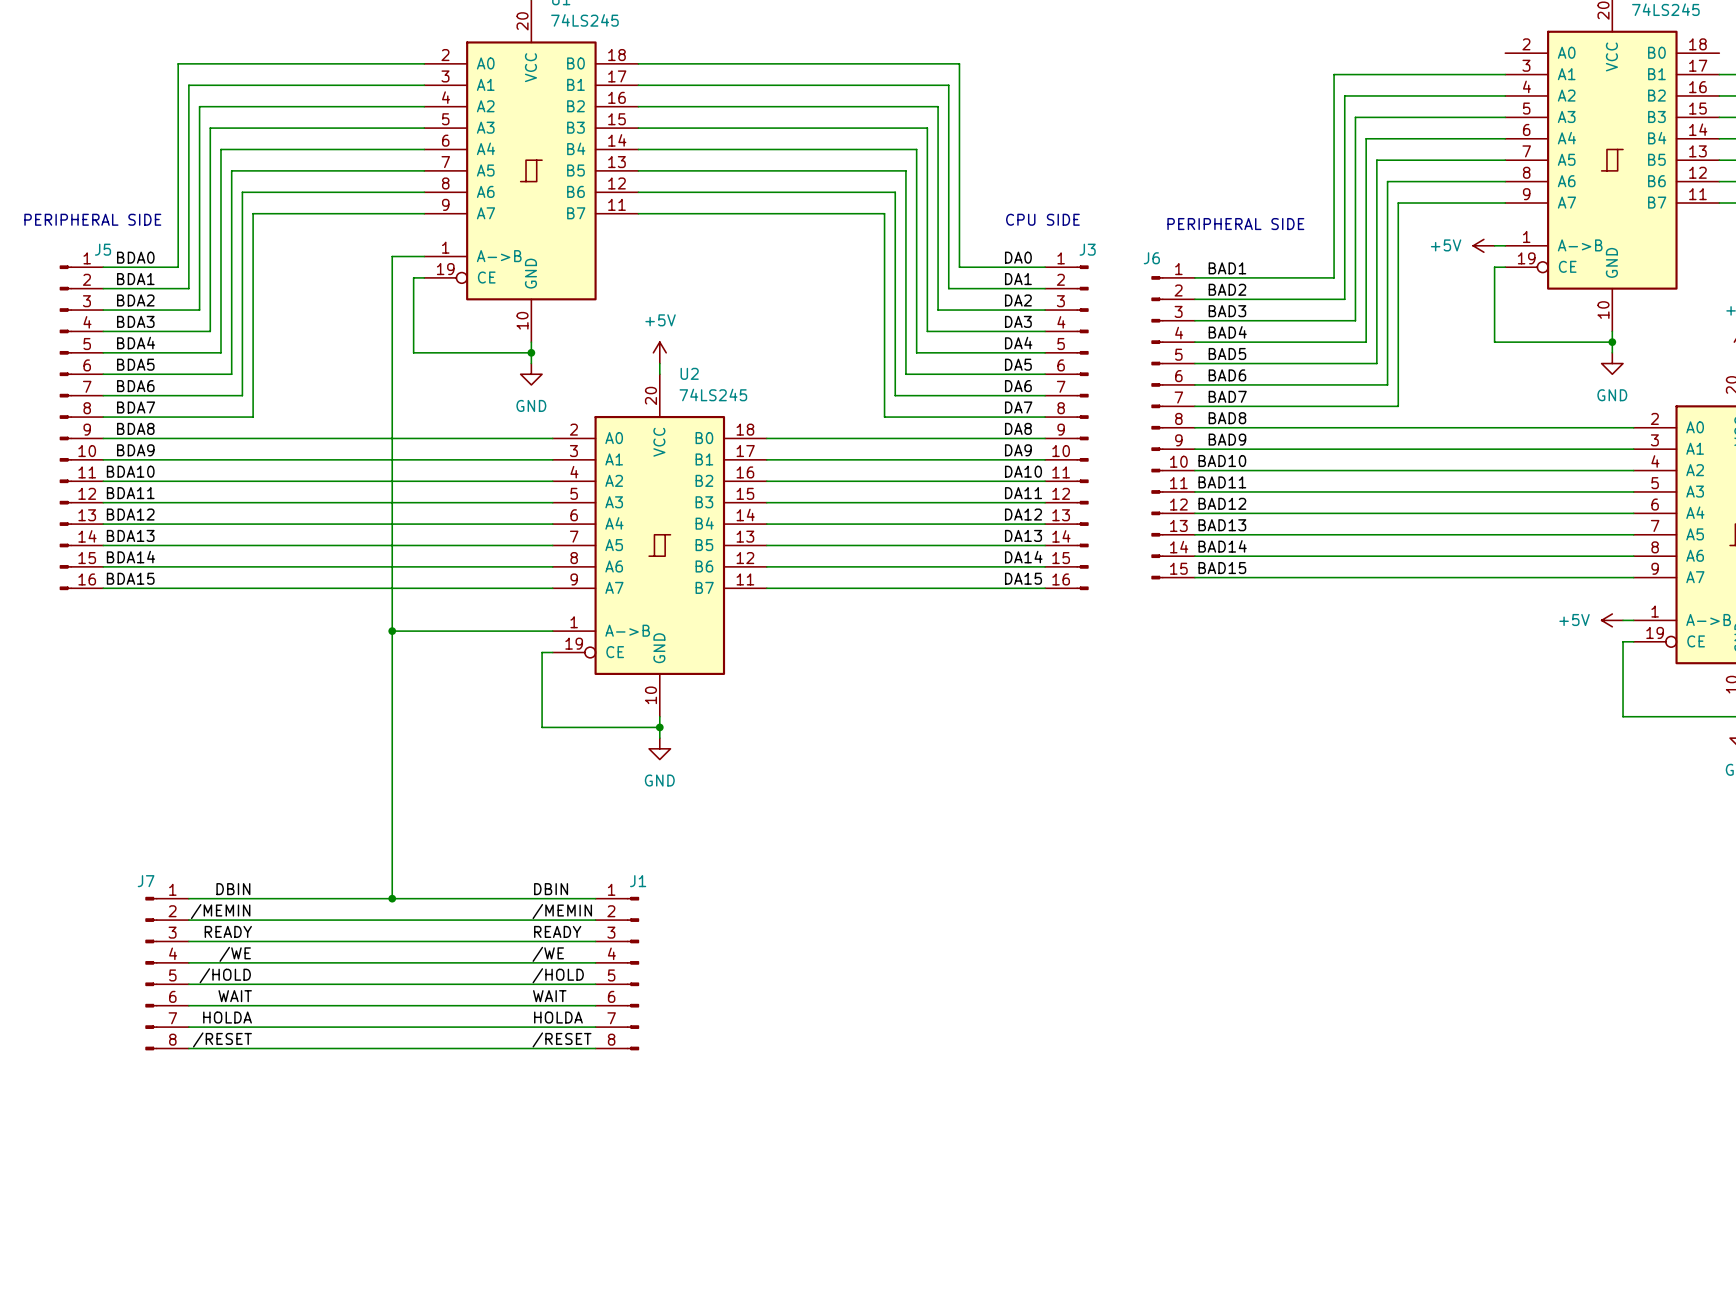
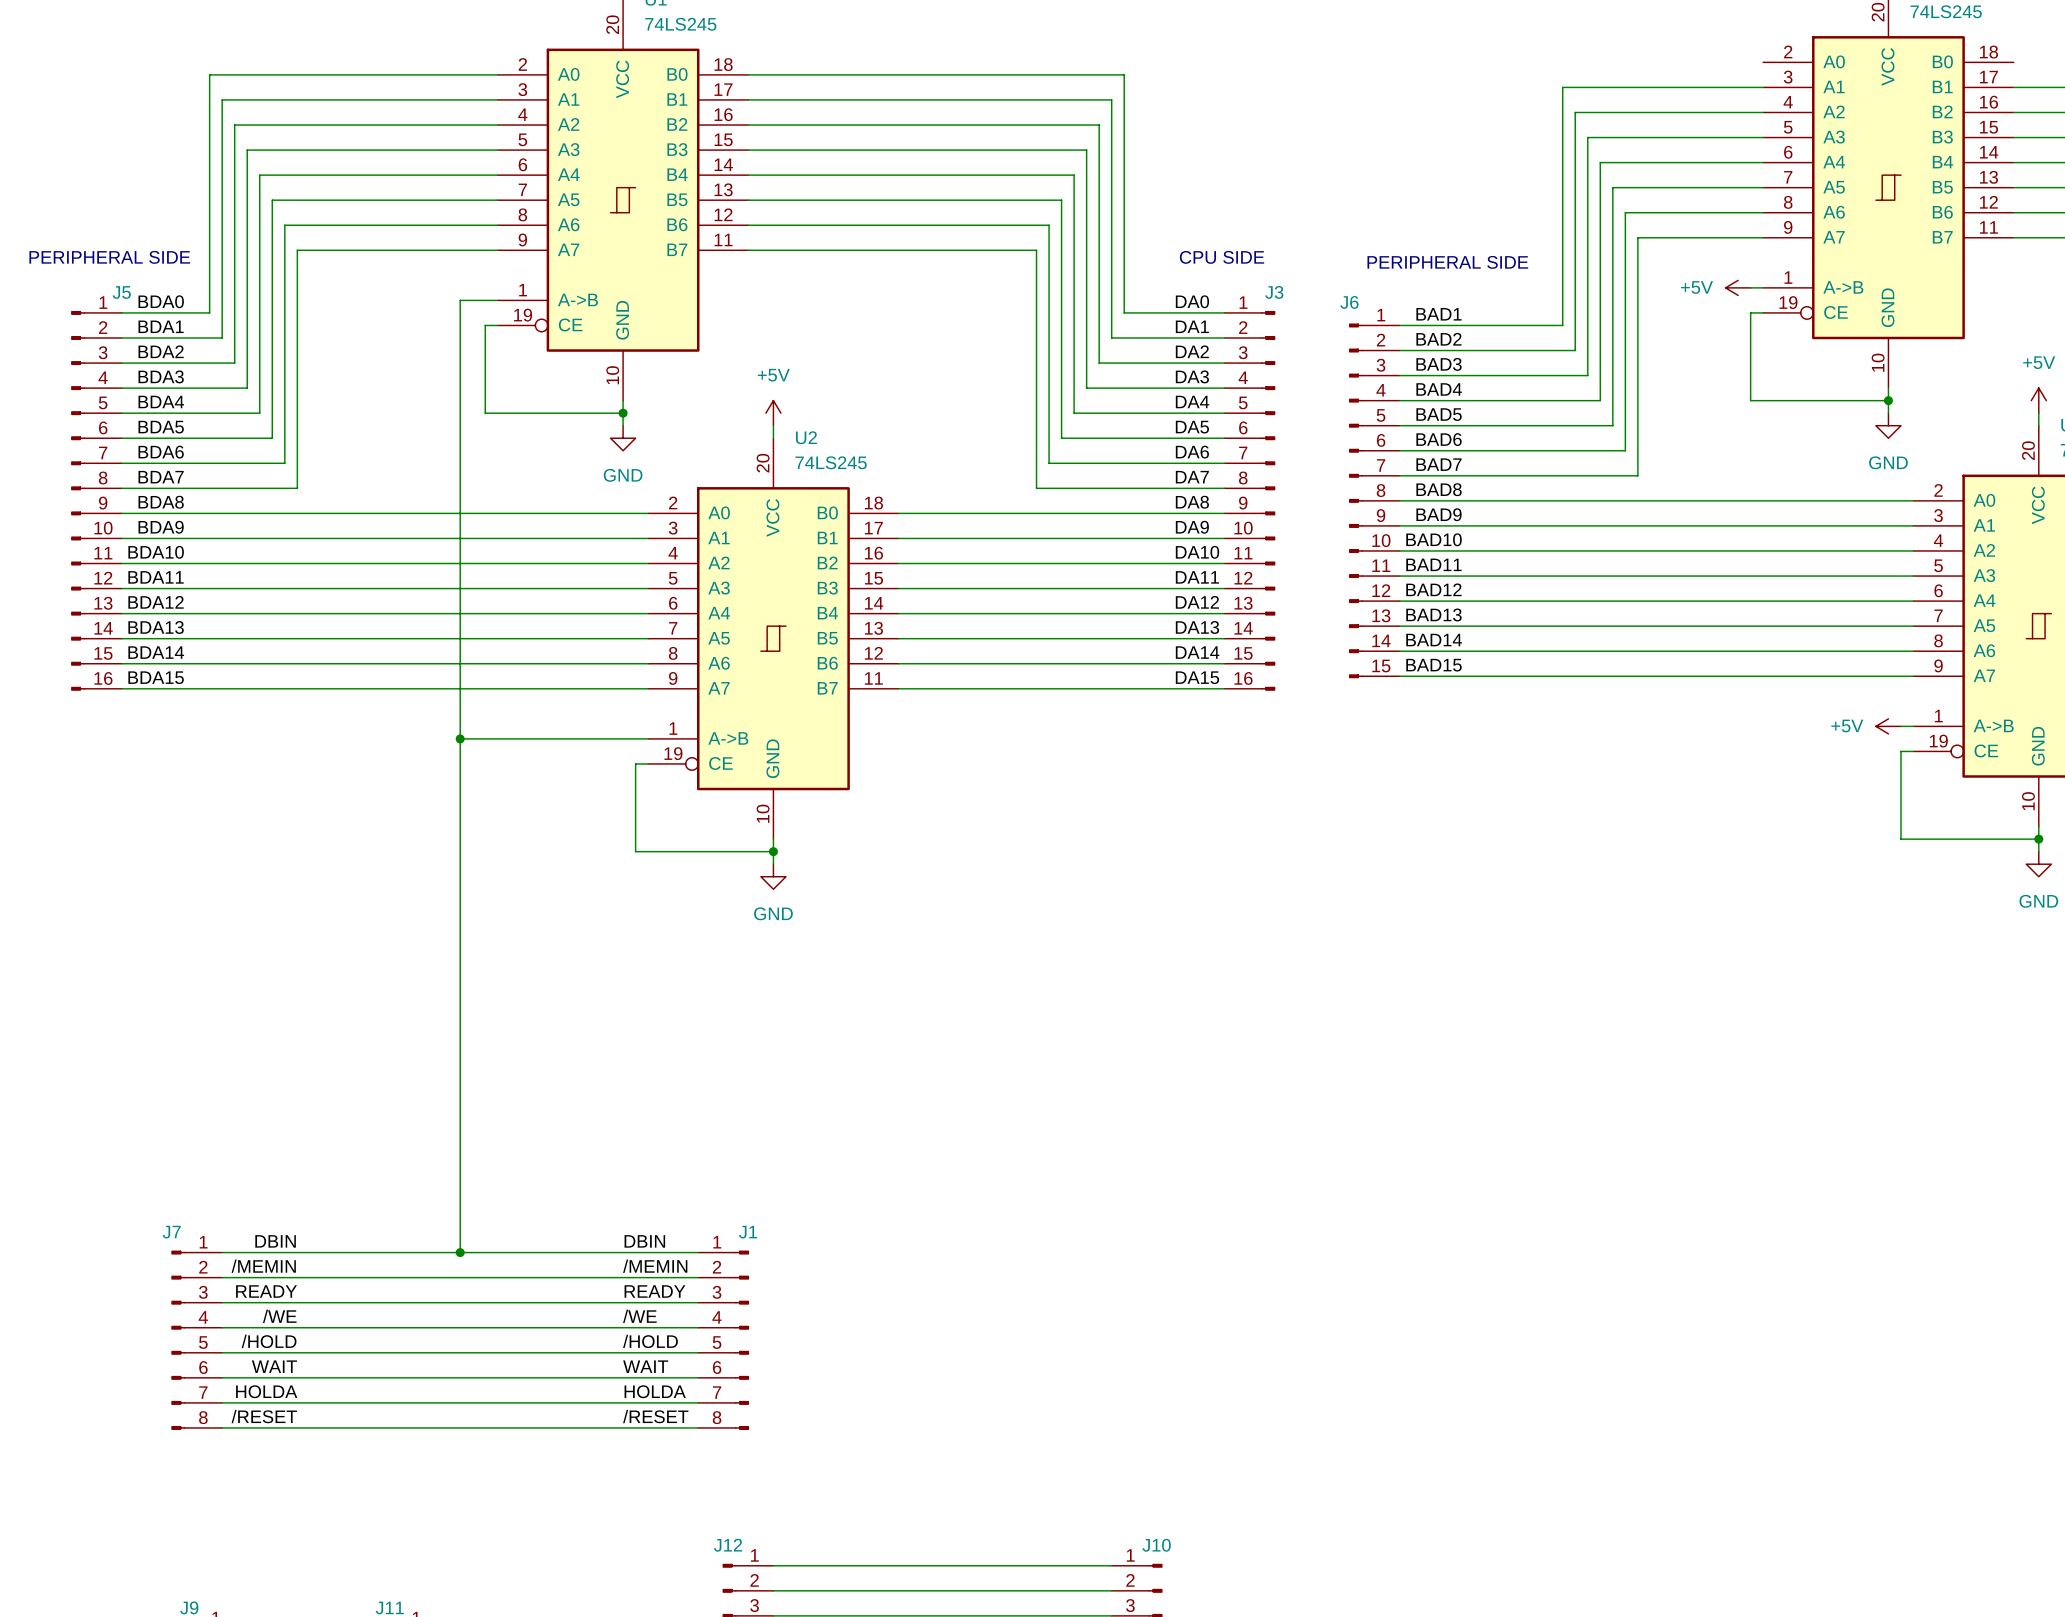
label: DBIN (233, 889) -> none
label: DBIN (551, 889) -> none
wire: (188, 898) (595, 898) -> (222, 1252) (698, 1252)
wire: none -> (460, 1052) (460, 1252)
junction: (392, 898) -> none
label: /MEMIN (220, 911) -> none
label: /MEMIN (562, 911) -> none
wire: (188, 920) (595, 920) -> (222, 1277) (698, 1277)
label: READY (228, 931) -> none
label: READY (557, 931) -> none
wire: (188, 941) (595, 941) -> (222, 1302) (698, 1302)
label: /WE (235, 954) -> none
label: /WE (548, 954) -> none
wire: (188, 962) (595, 962) -> (222, 1327) (698, 1327)
J7 position: (167, 973) -> (196, 1340)
J1 position: (617, 973) -> (723, 1340)
label: /HOLD (225, 975) -> none
label: /HOLD (558, 975) -> none
wire: (188, 984) (595, 984) -> (222, 1352) (698, 1352)
label: WAIT (235, 996) -> none
label: WAIT (549, 996) -> none
wire: (188, 1005) (595, 1005) -> (222, 1377) (698, 1377)
label: HOLDA (227, 1017) -> none
label: HOLDA (558, 1017) -> none
wire: (188, 1027) (595, 1027) -> (222, 1402) (698, 1402)
label: /RESET (222, 1039) -> none
label: /RESET (562, 1039) -> none
wire: (188, 1048) (595, 1048) -> (222, 1427) (698, 1427)
label: none -> DBIN (275, 1241)
label: none -> DBIN (644, 1241)
junction: none -> (460, 1252)
label: none -> /MEMIN (263, 1266)
label: none -> /MEMIN (655, 1266)
label: none -> READY (266, 1291)
label: none -> READY (655, 1291)
label: none -> /WE (279, 1316)
label: none -> /WE (639, 1316)
label: none -> /HOLD (269, 1341)
label: none -> /HOLD (650, 1341)
label: none -> WAIT (274, 1366)
label: none -> WAIT (645, 1366)
label: none -> HOLDA (266, 1391)
label: none -> HOLDA (655, 1391)
label: none -> /RESET (264, 1416)
label: none -> /RESET (655, 1416)

